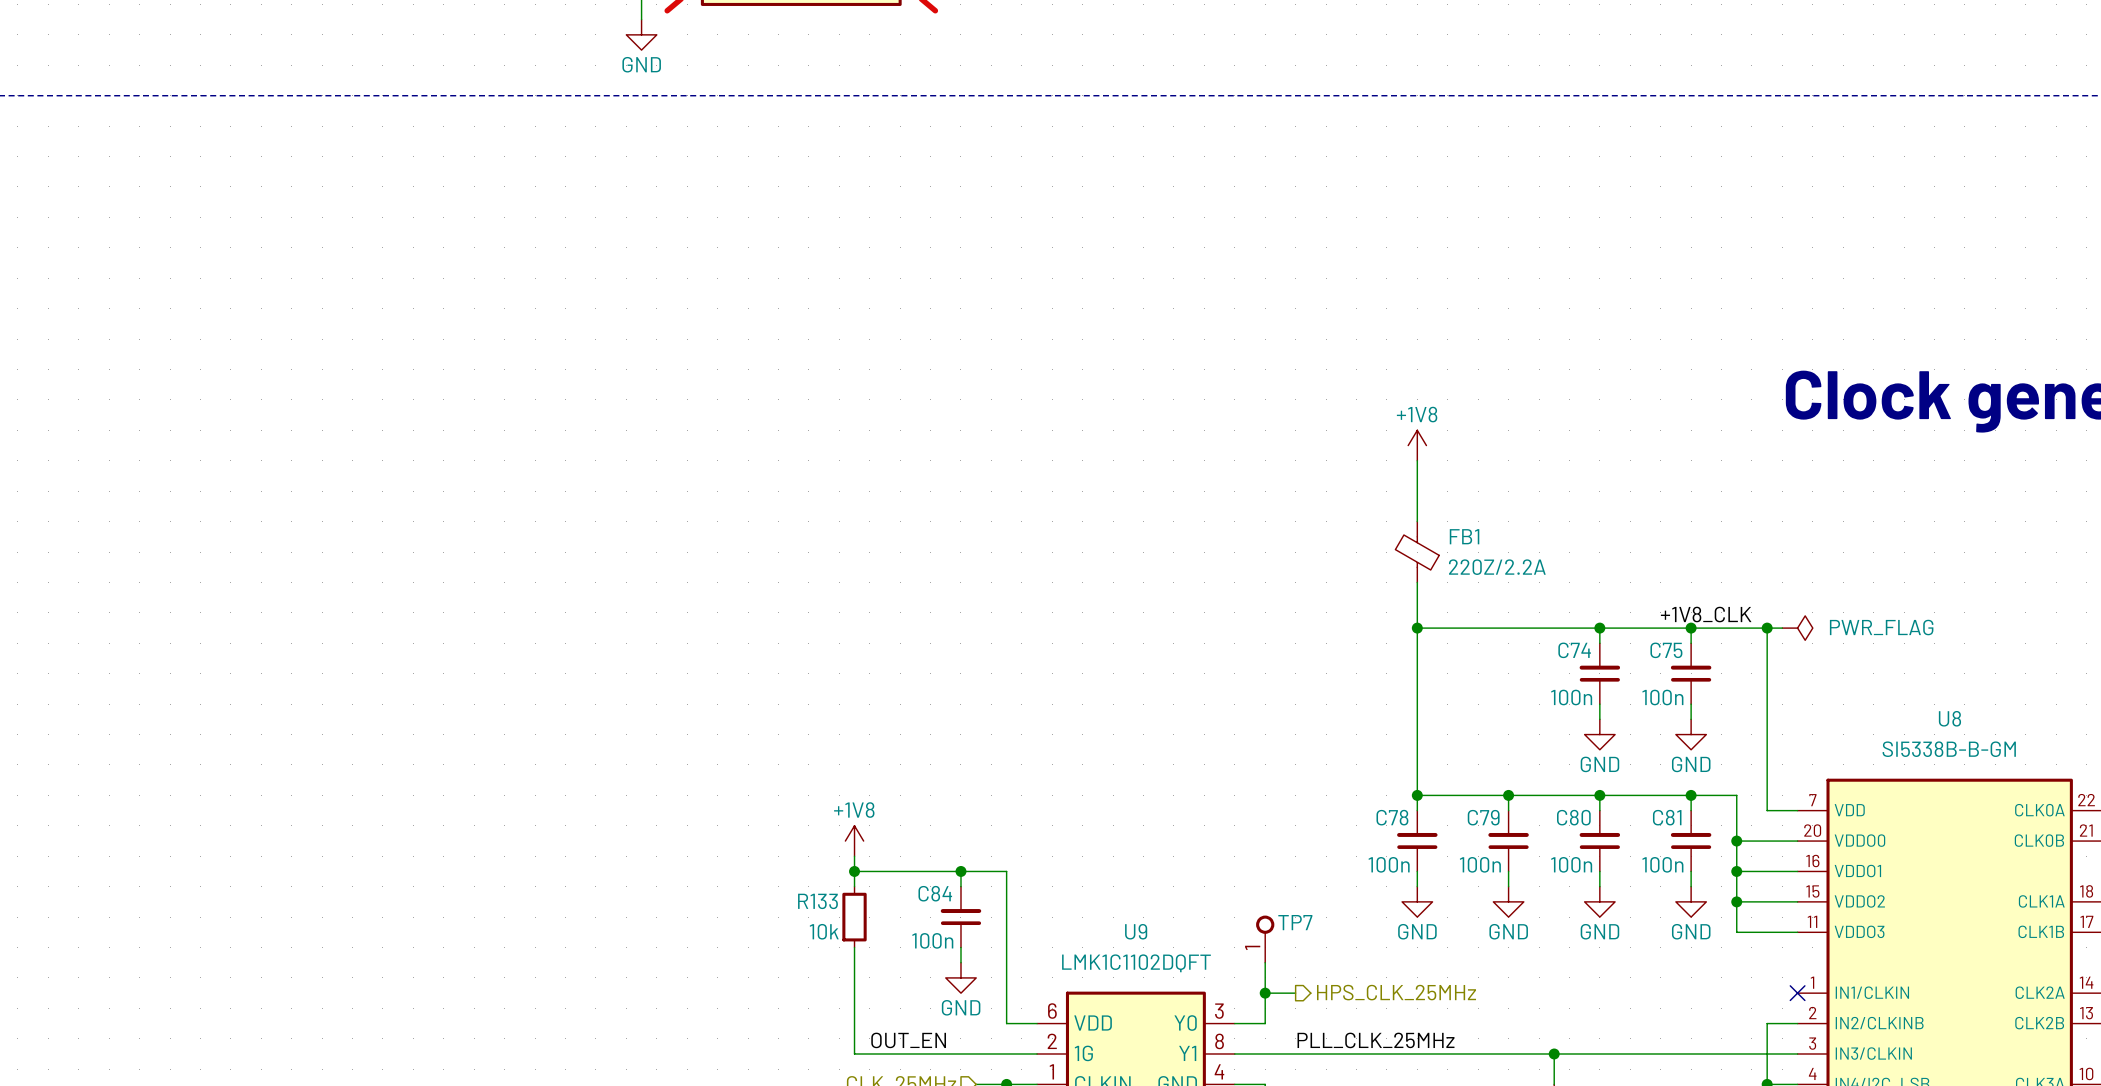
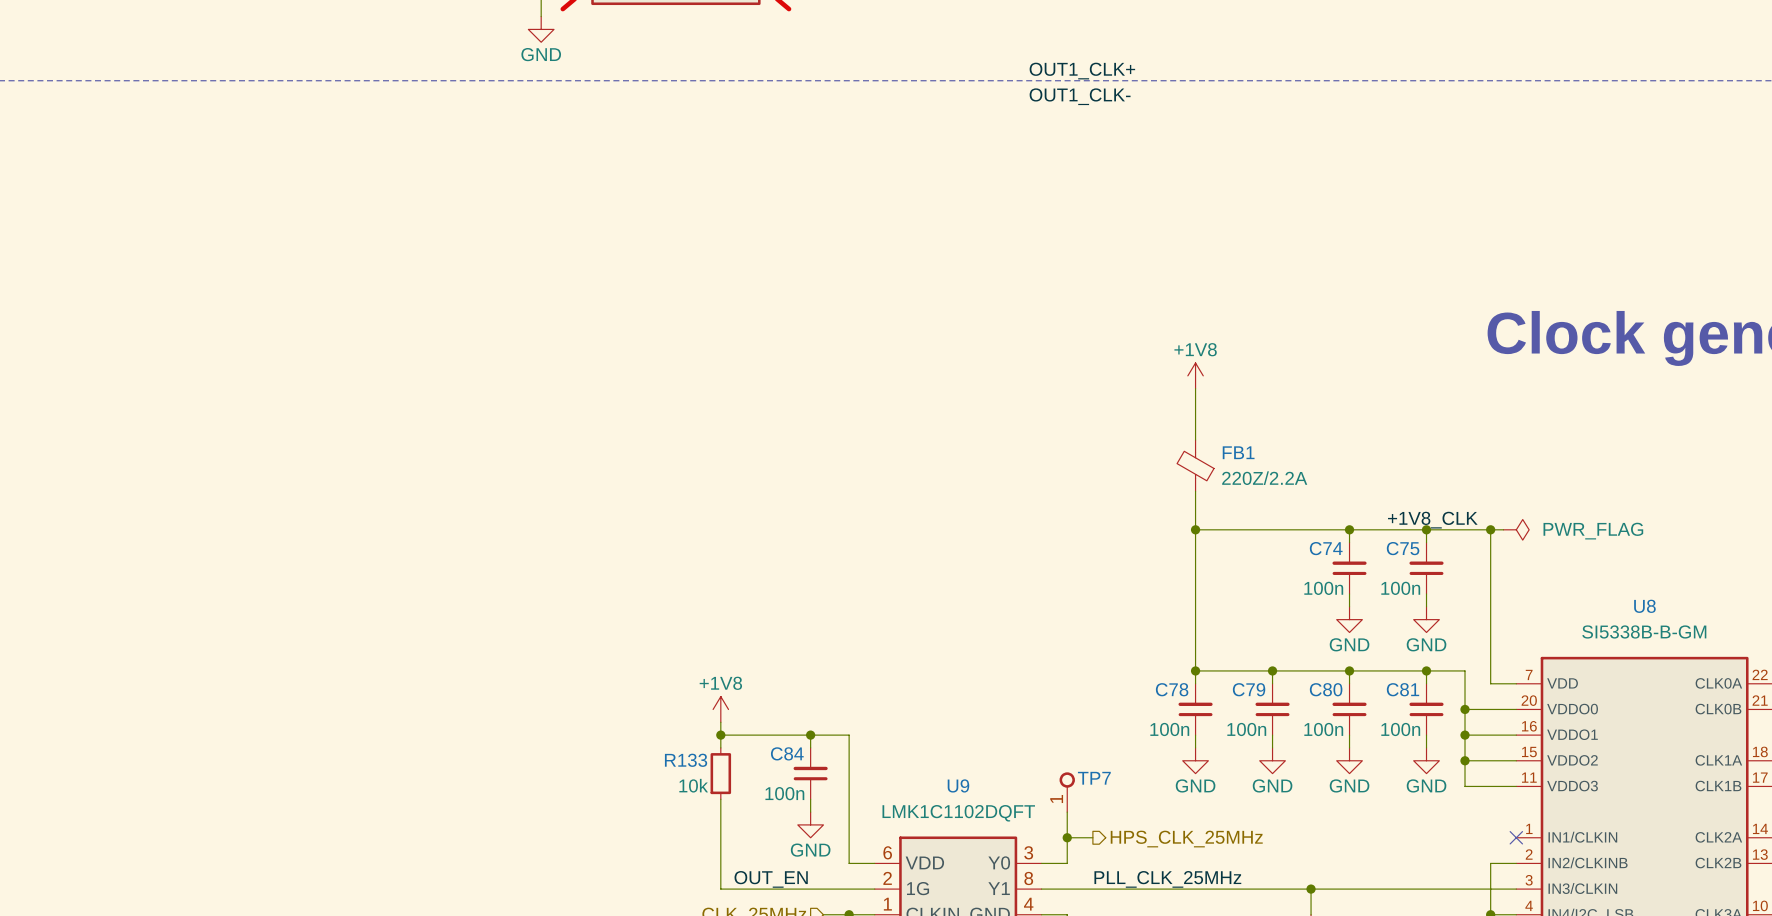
label: none -> OUT1_CLK+ (1082, 71)
label: none -> OUT1_CLK- (1080, 96)

